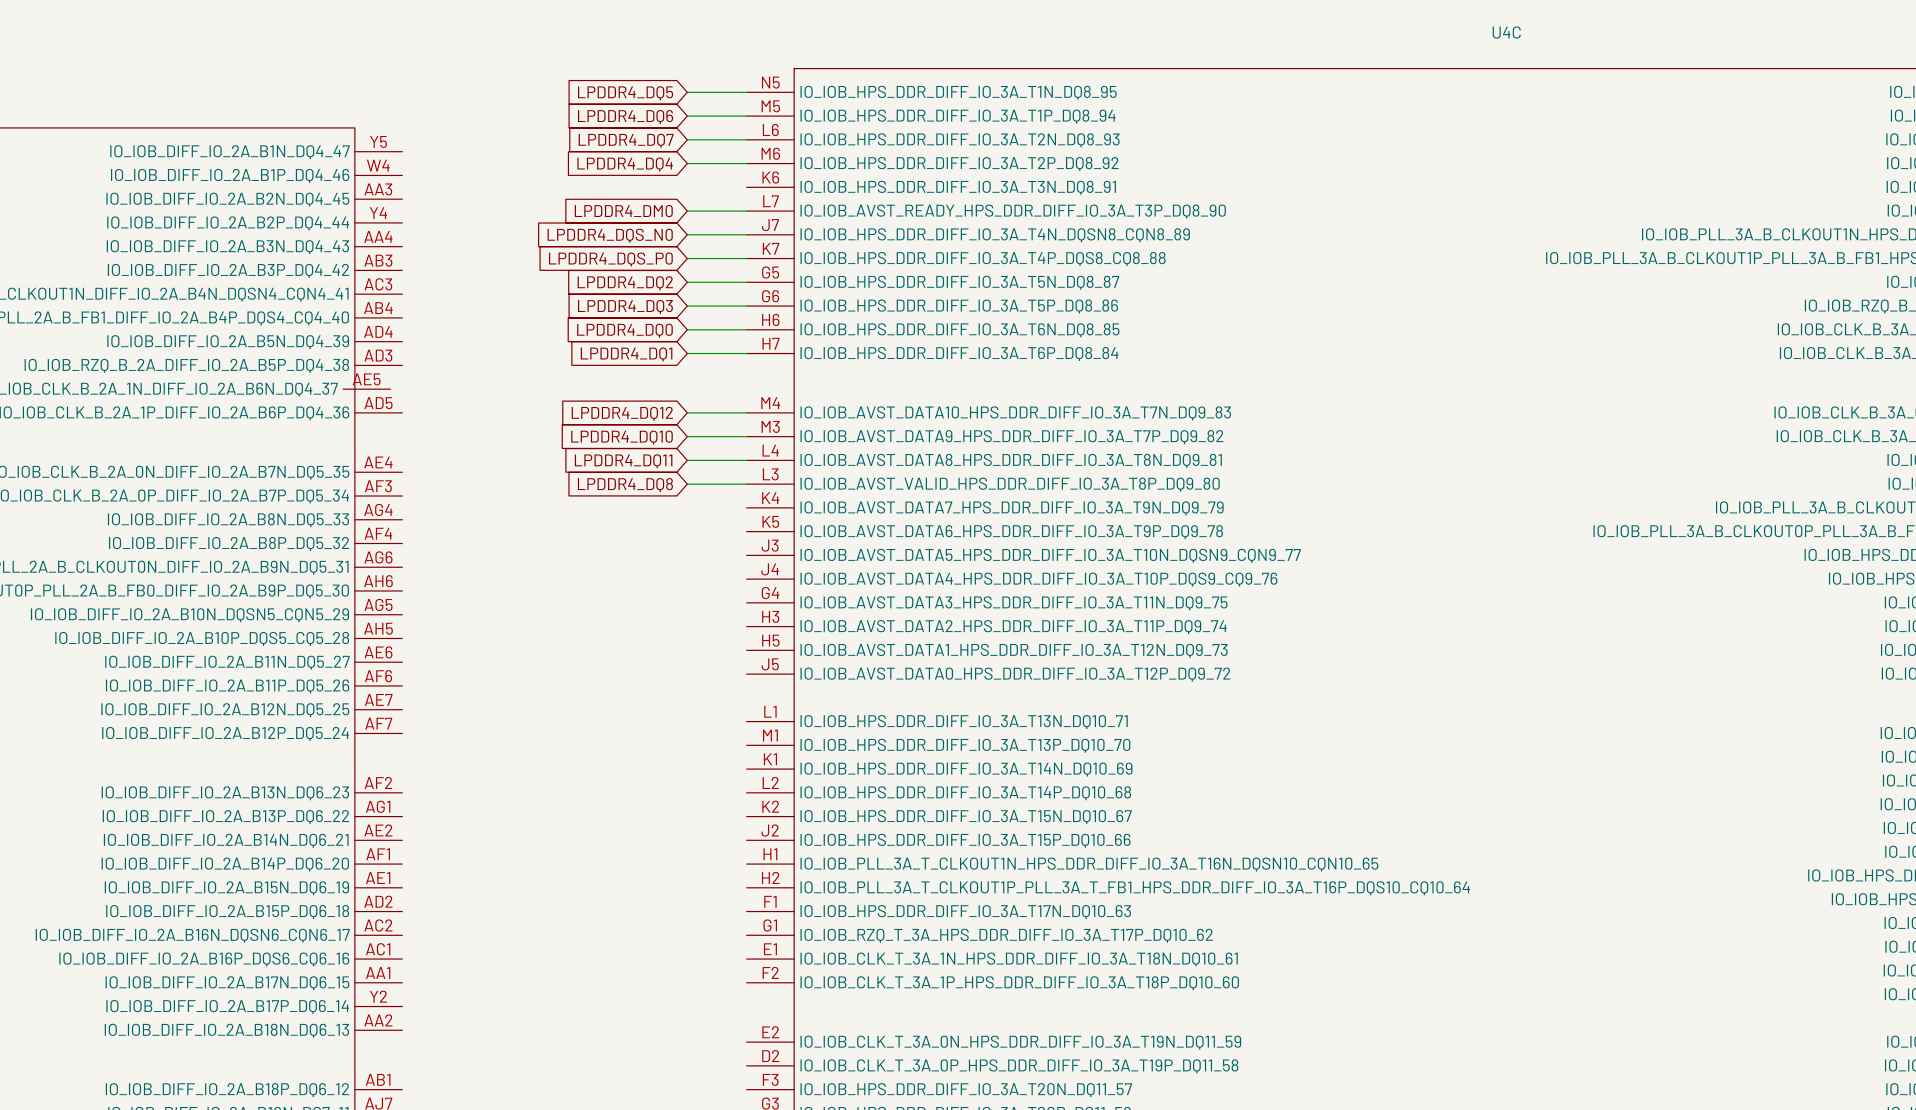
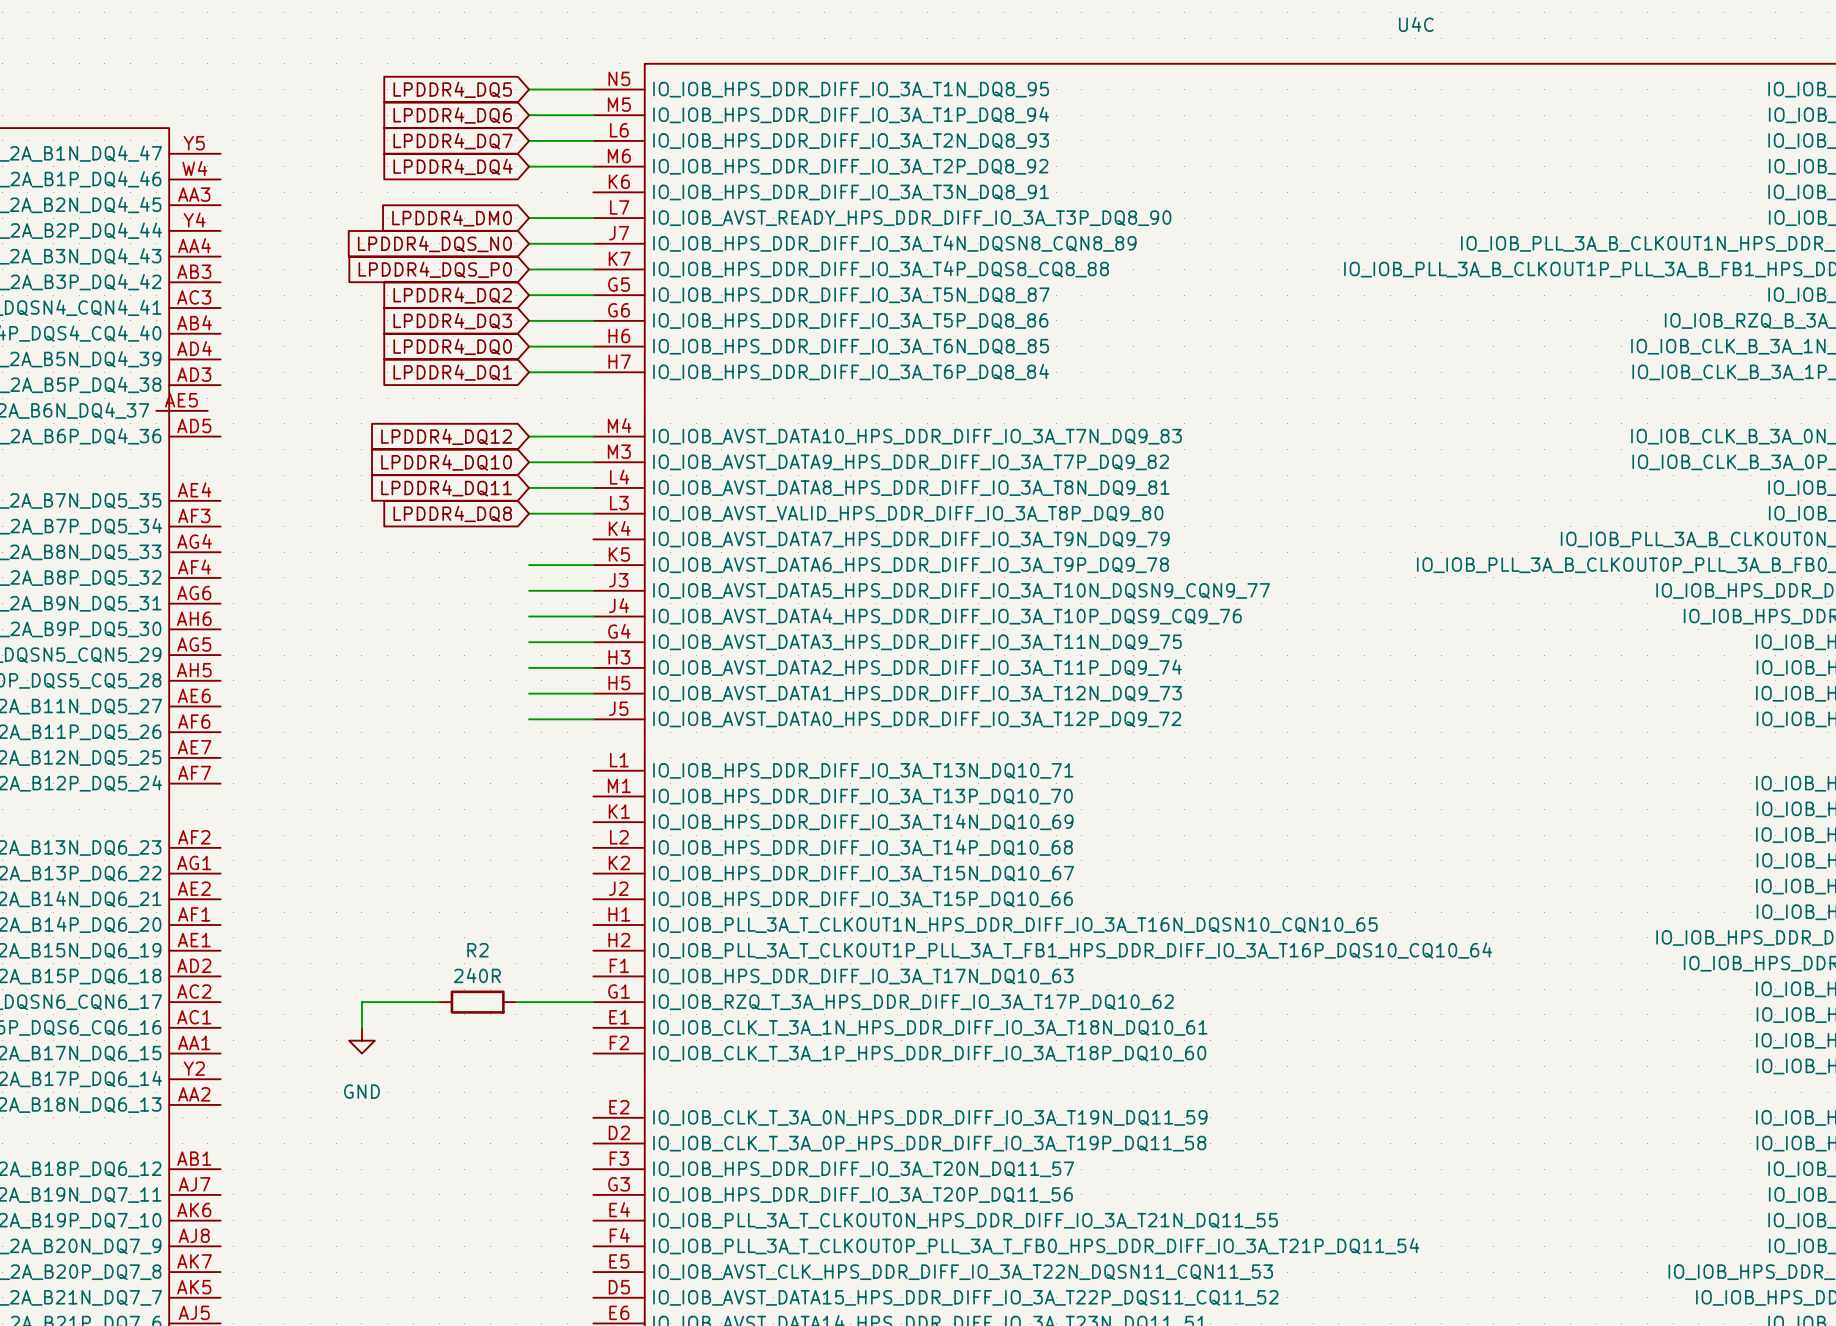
wire: none -> (529, 565) (593, 565)
wire: none -> (529, 590) (593, 590)
wire: none -> (529, 616) (593, 616)
wire: none -> (529, 642) (593, 642)
wire: none -> (529, 667) (593, 667)
wire: none -> (529, 693) (593, 693)
wire: none -> (529, 719) (593, 719)
wire: none -> (439, 1002) (361, 1002) (361, 1027)
R2: none -> 240R (477, 1002)
wire: none -> (516, 1002) (593, 1002)
power symbol: none -> GND (361, 1040)

